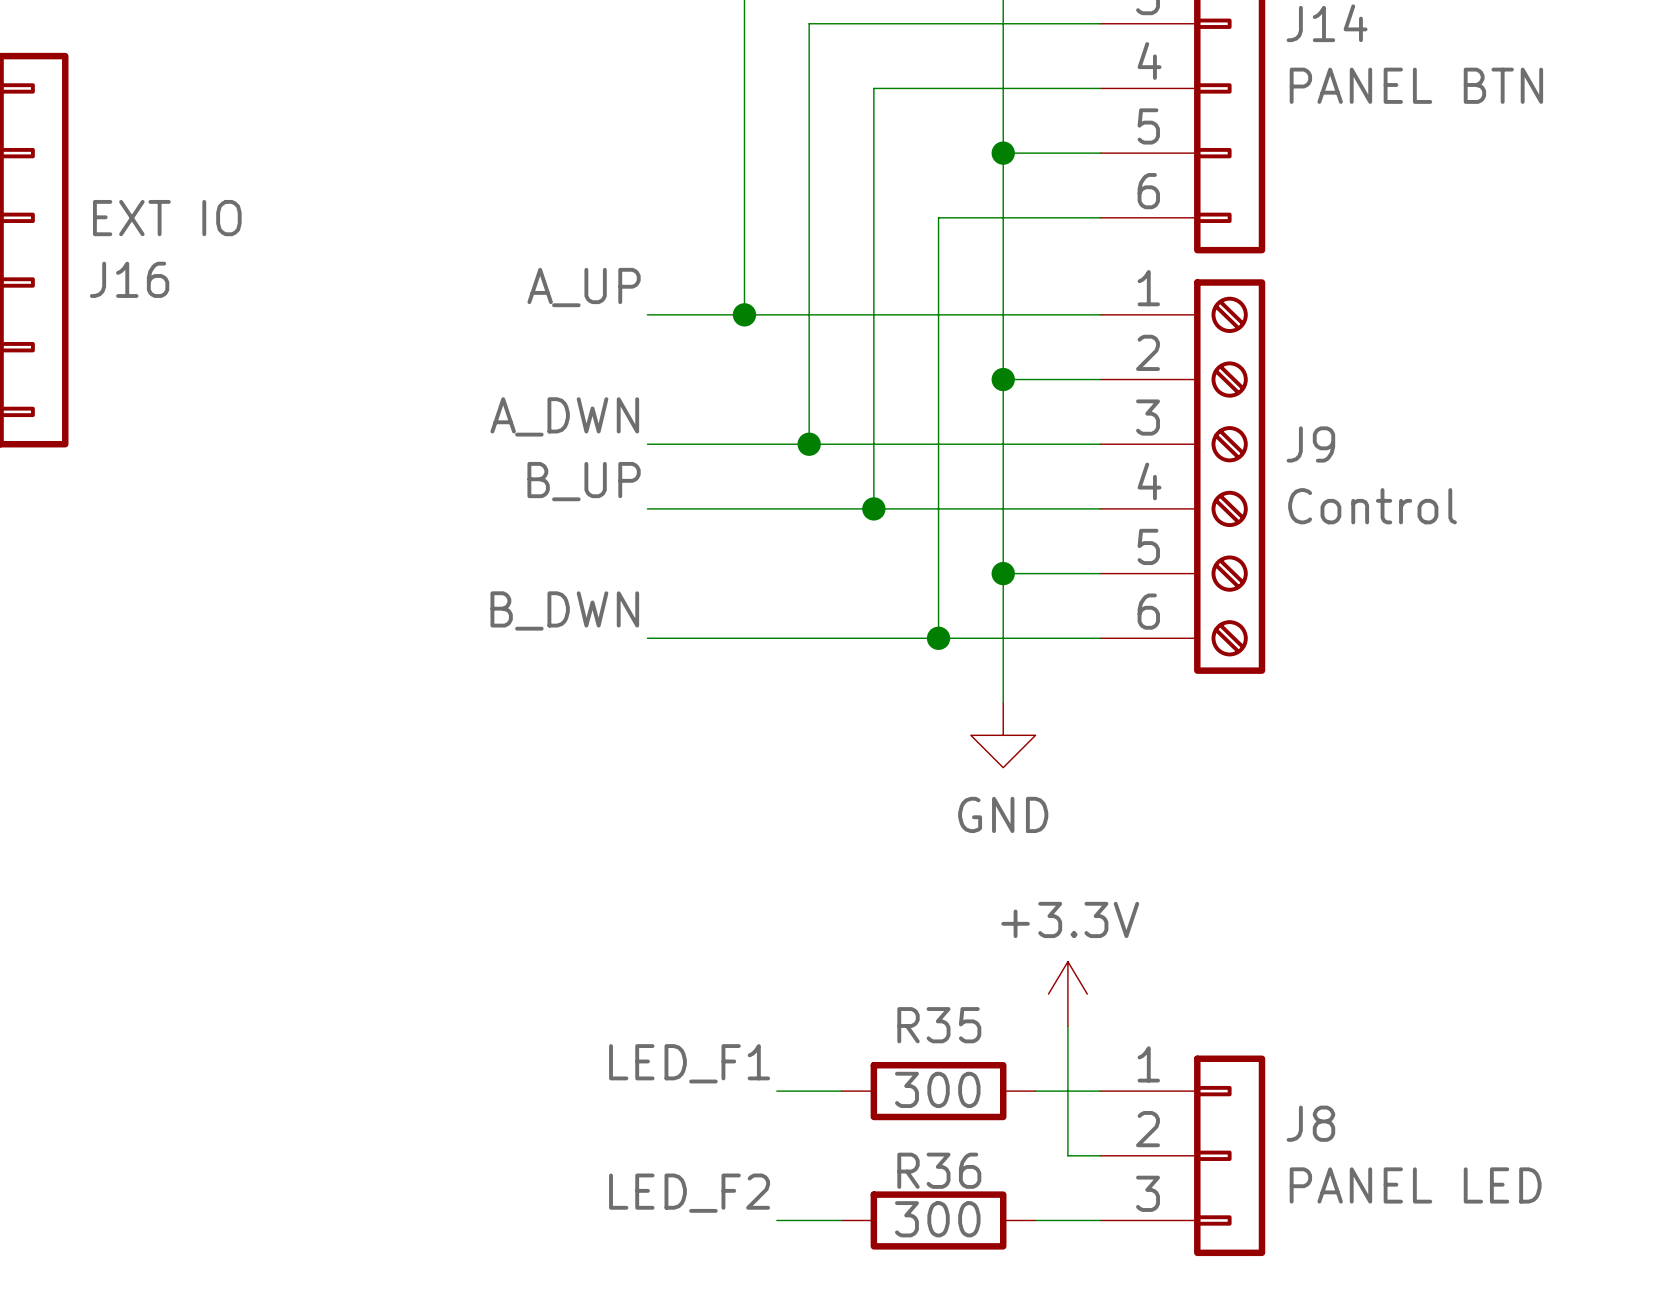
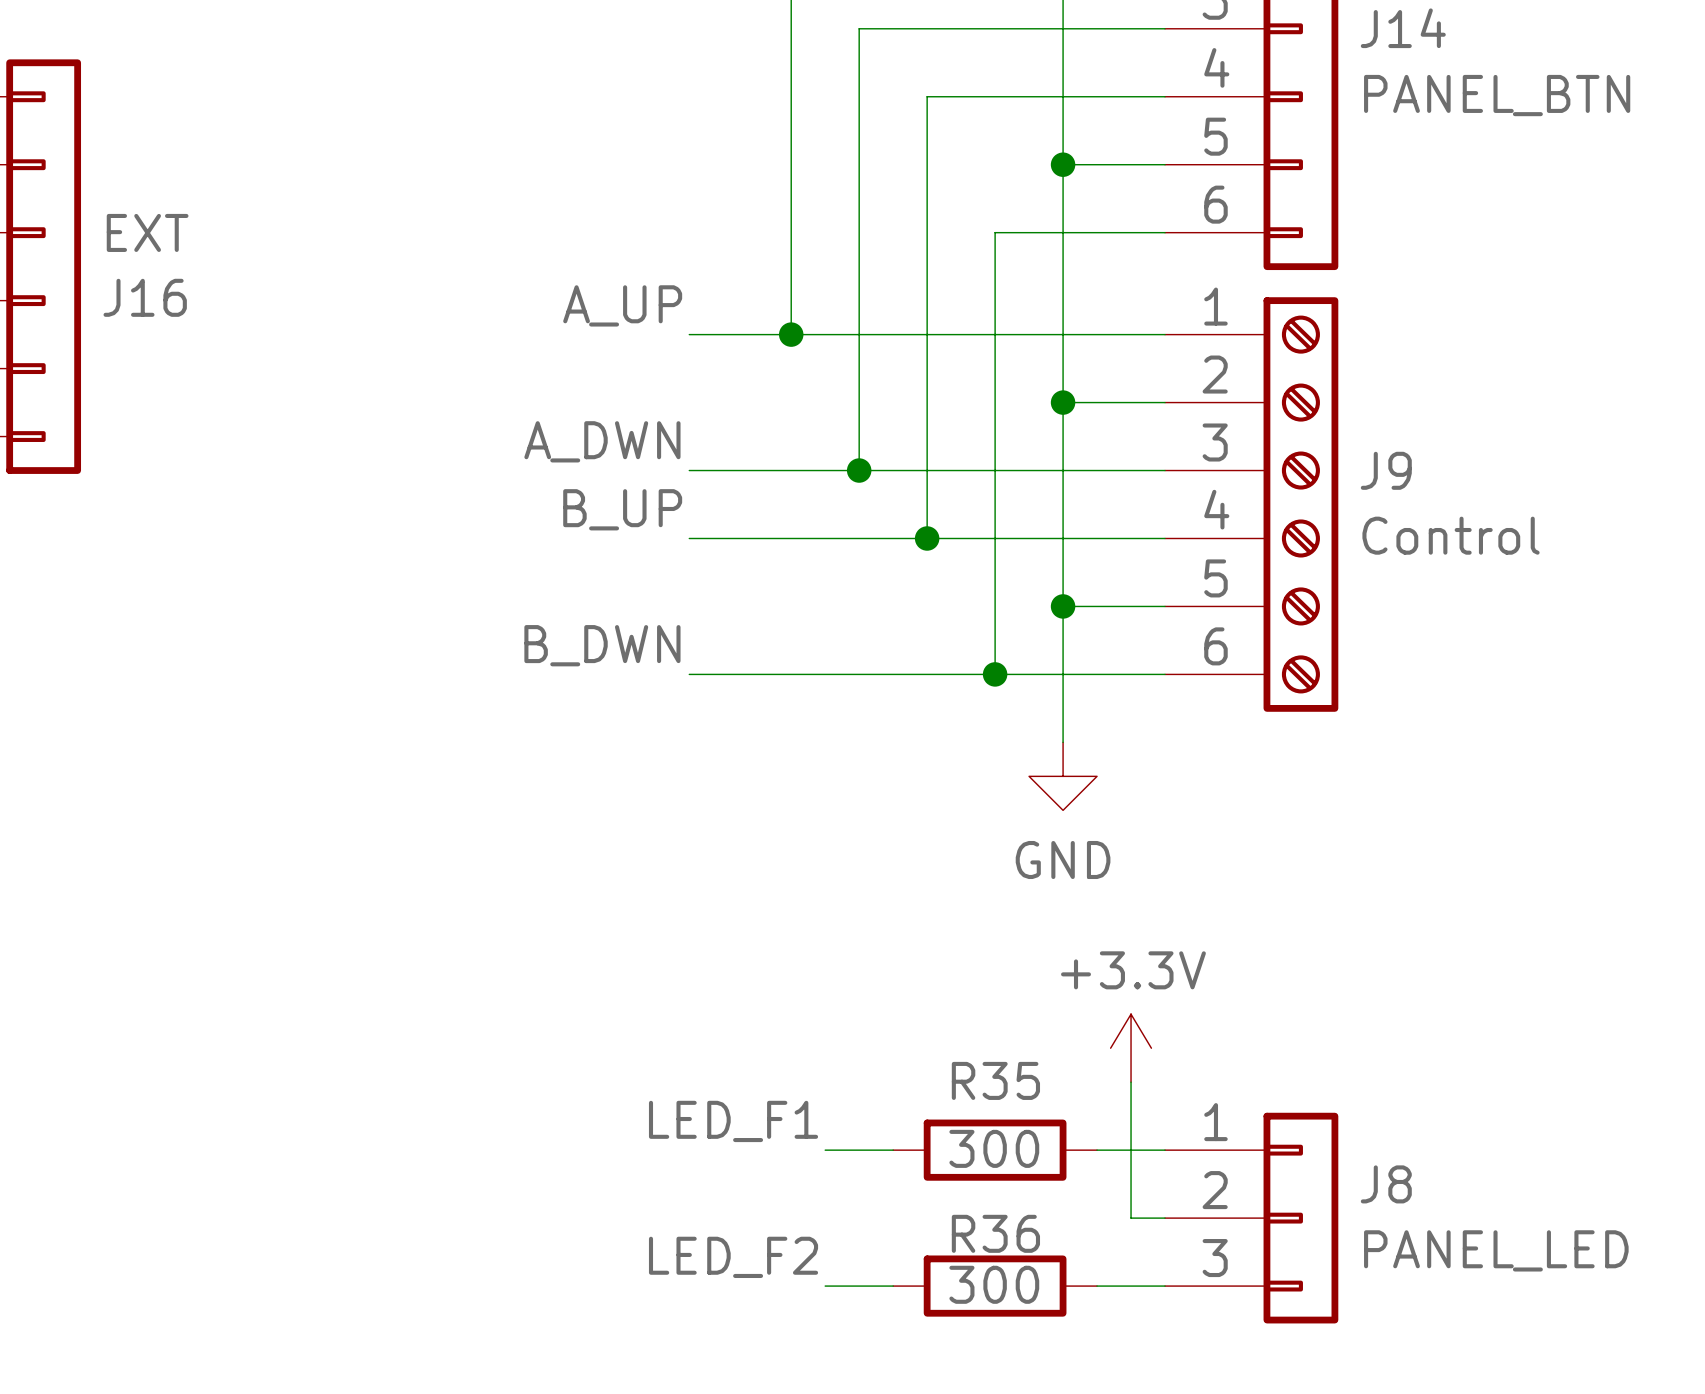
J14 value: PANEL BTN (1416, 85) -> PANEL_BTN (1497, 95)
J16 value: EXT IO (167, 218) -> EXT (147, 232)
J8 value: PANEL LED (1415, 1185) -> PANEL_LED (1496, 1250)

